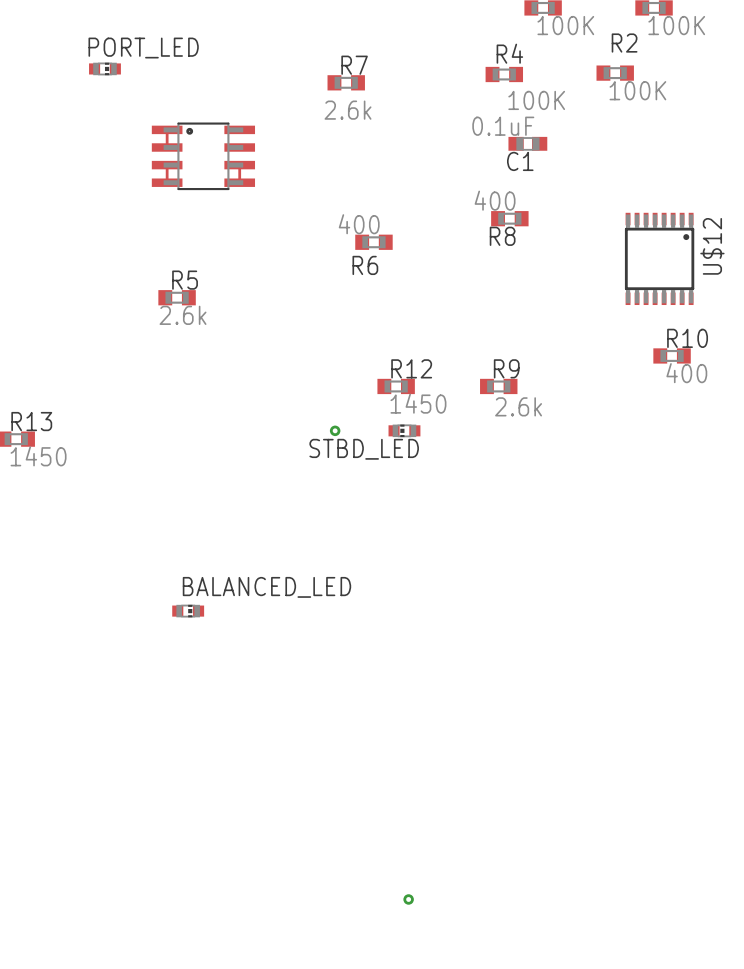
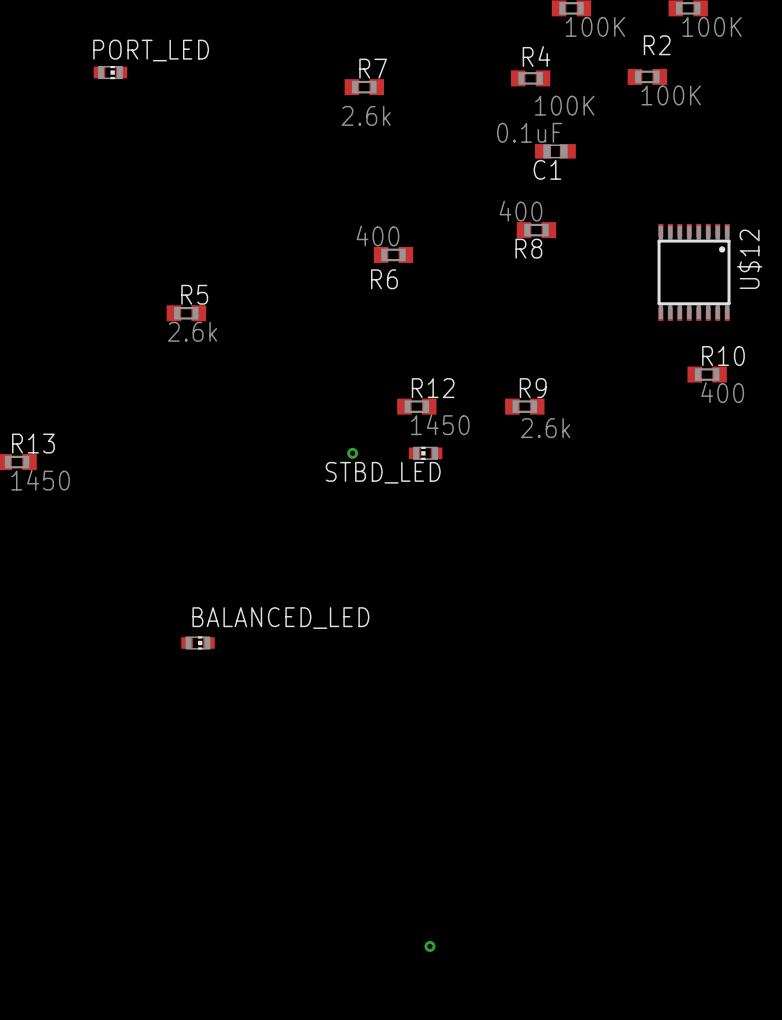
track: (167, 129) (167, 147) -> none
part: (203, 156) -> none
track: (167, 165) (167, 182) -> none
track: (239, 165) (239, 182) -> none

